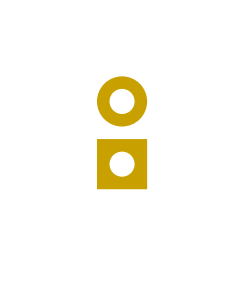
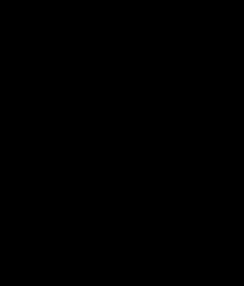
part: (122, 132) -> none

